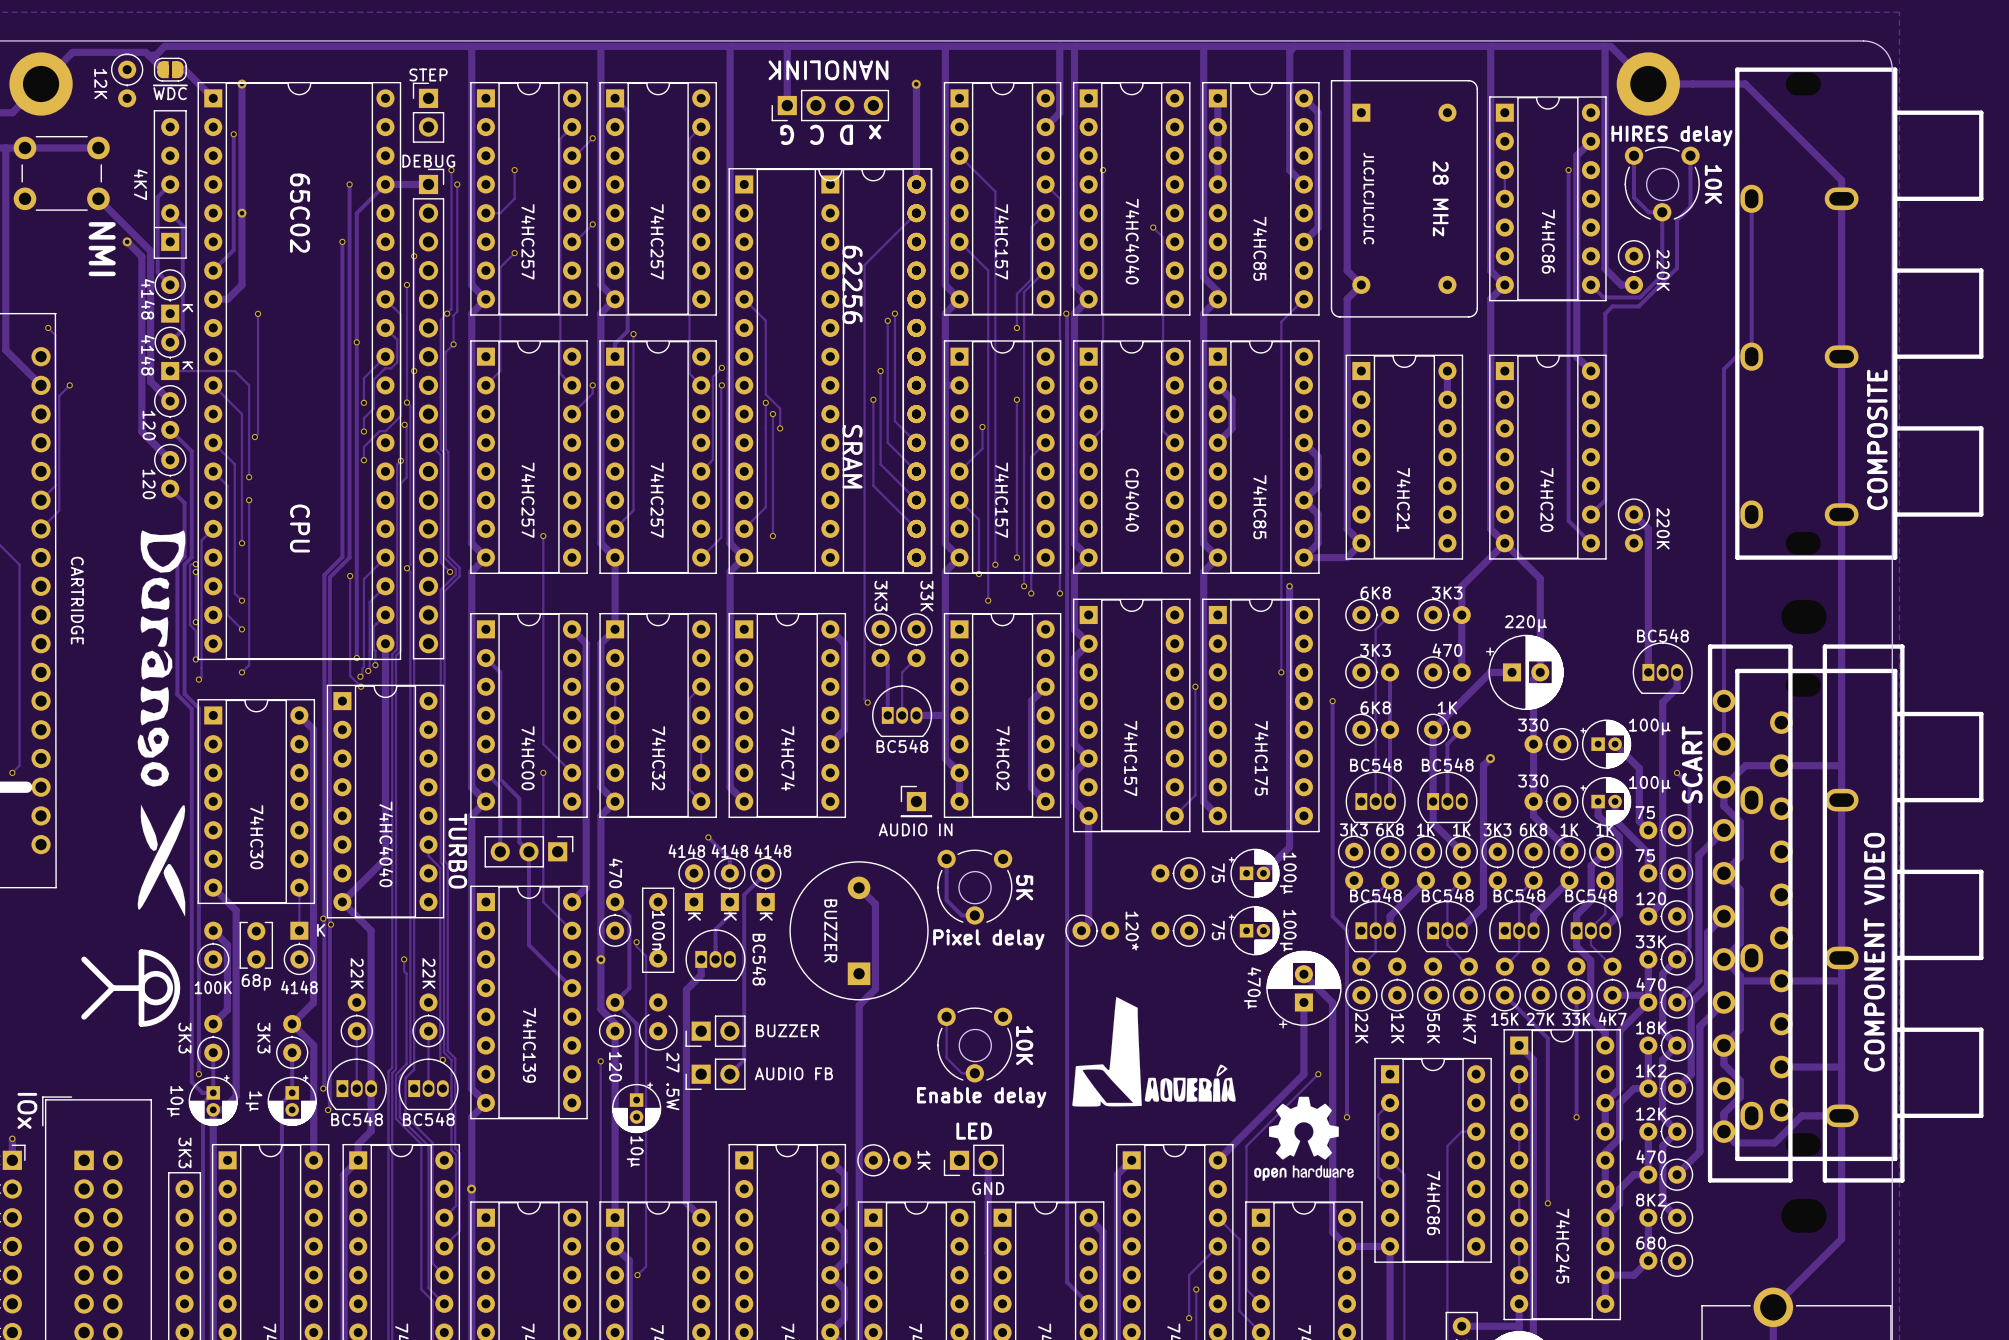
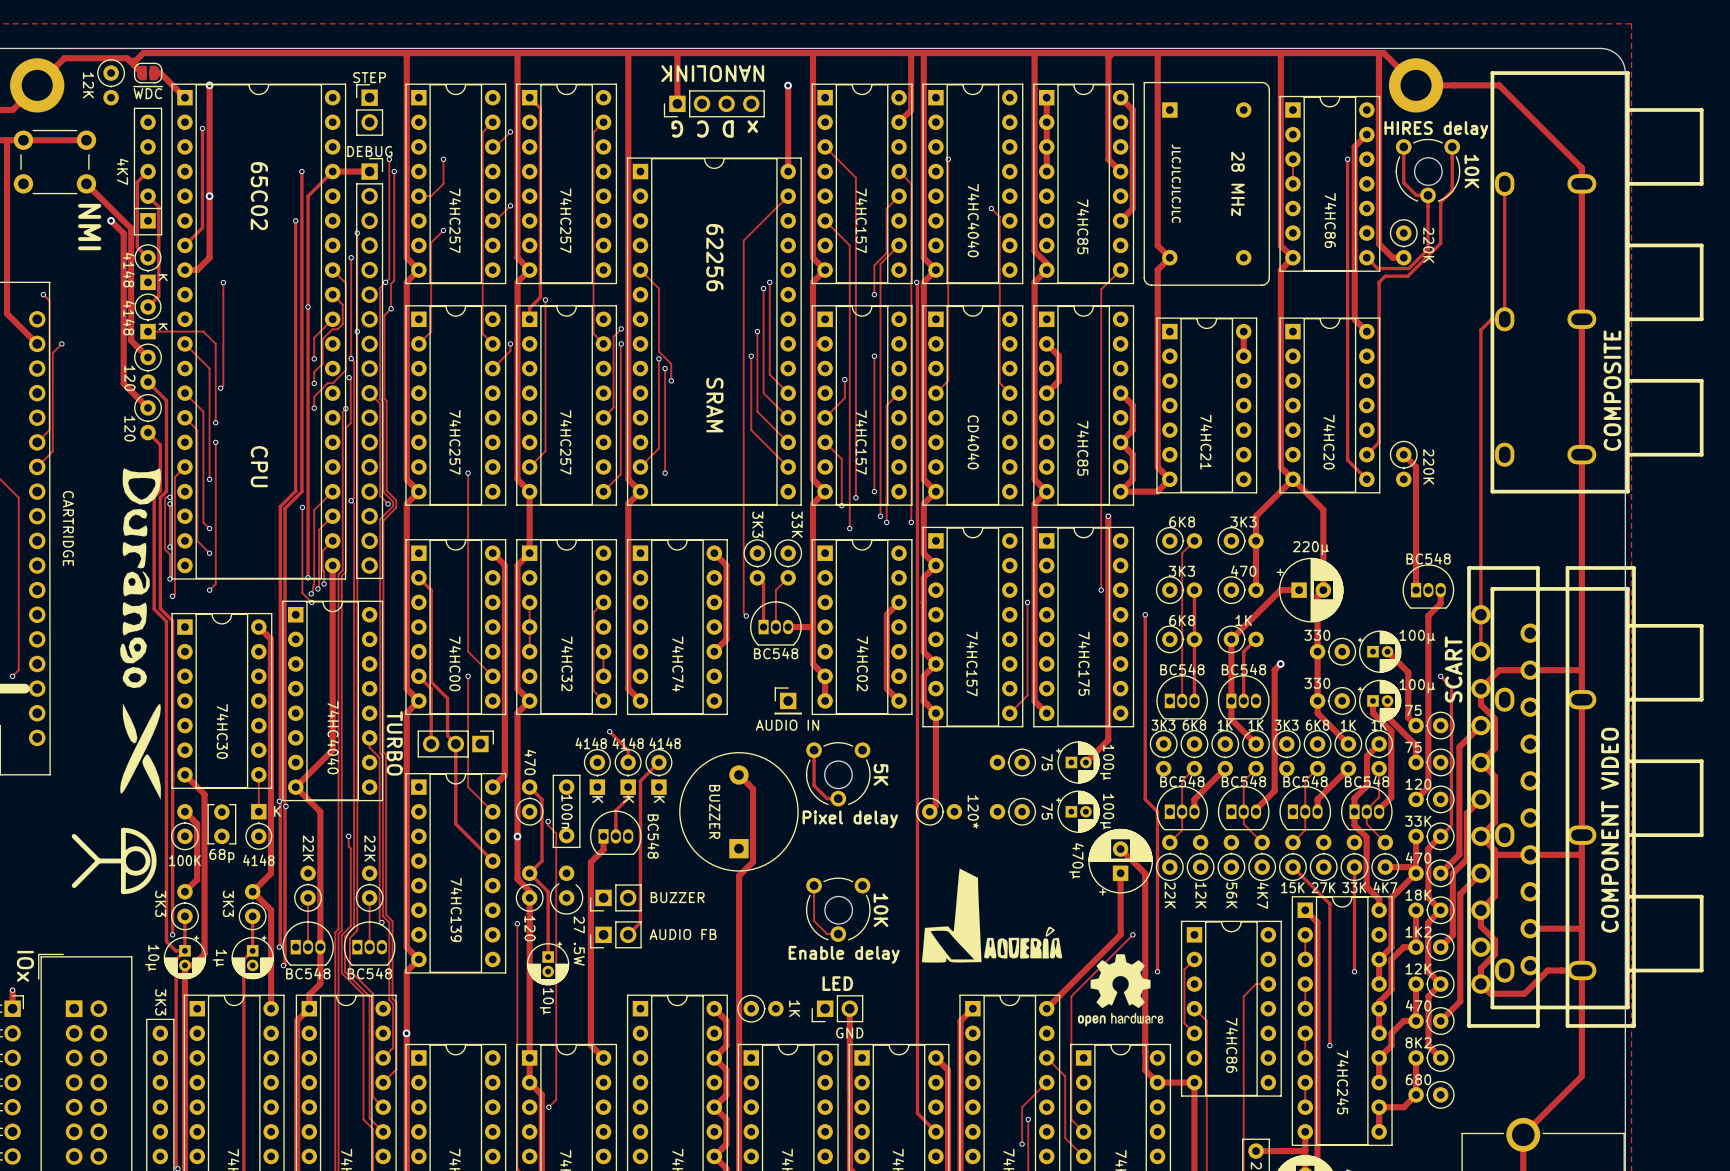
part value position: 62256 (852, 284) -> 62256 (714, 257)
part: (873, 371) -> none
text position: SRAM (852, 456) -> SRAM (714, 405)

